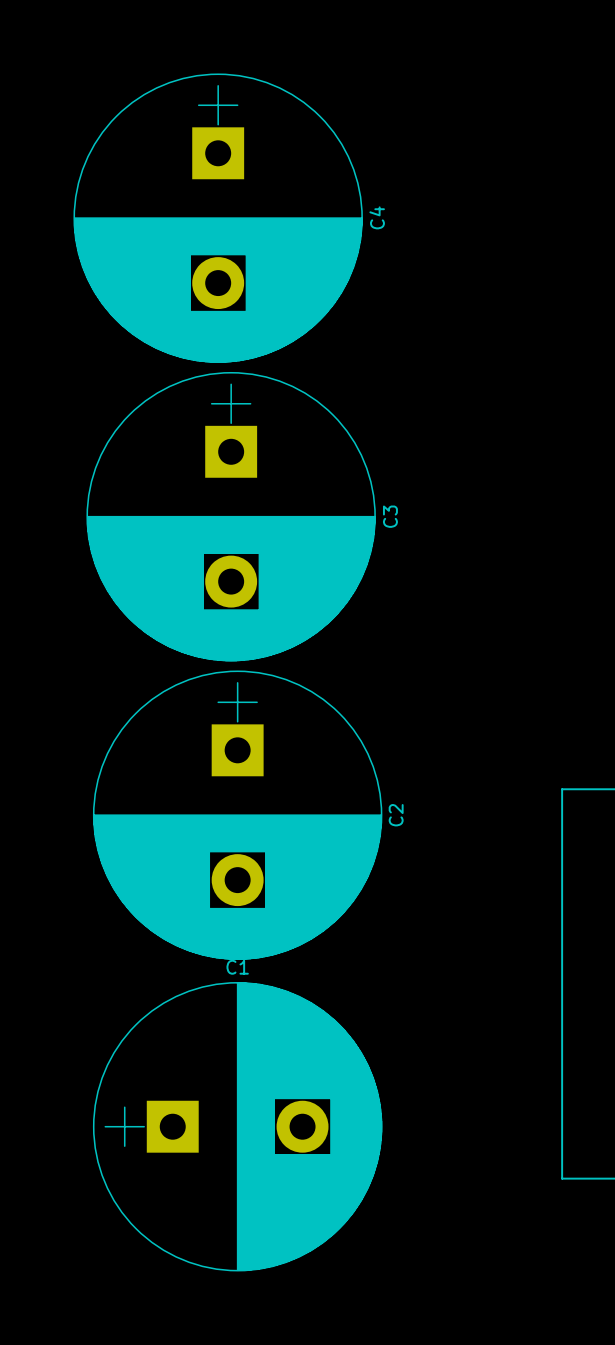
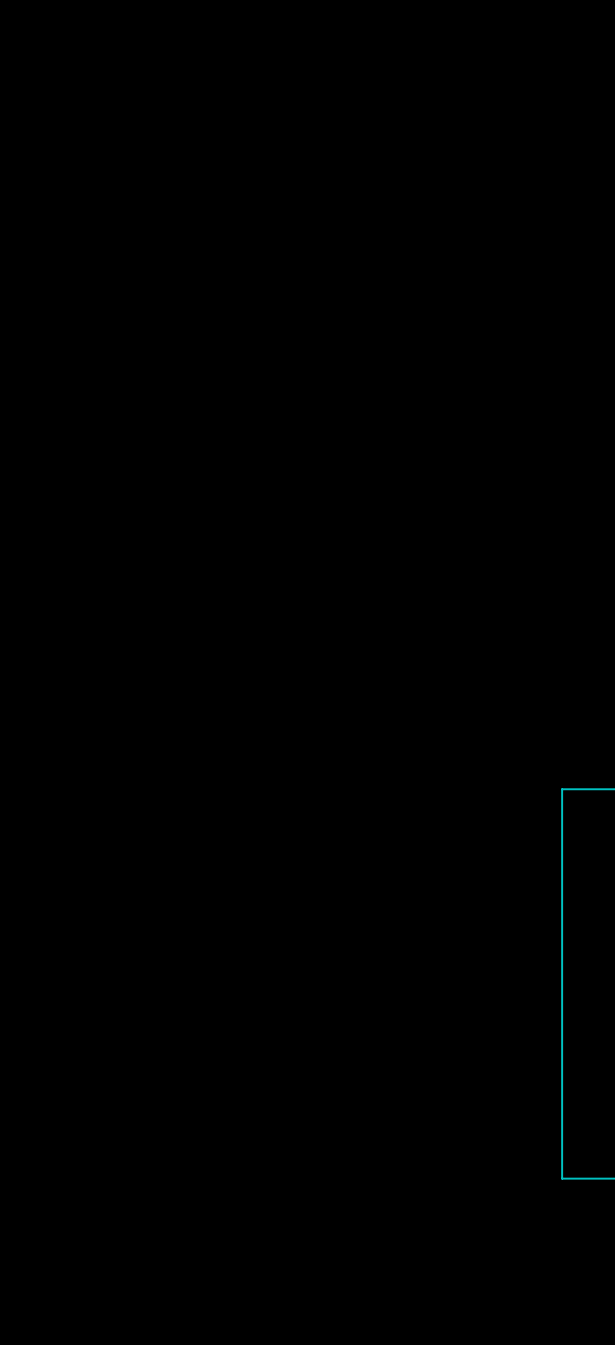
C4: (218, 218) -> none
C3: (231, 516) -> none
C2: (237, 815) -> none
C1: (237, 1126) -> none

